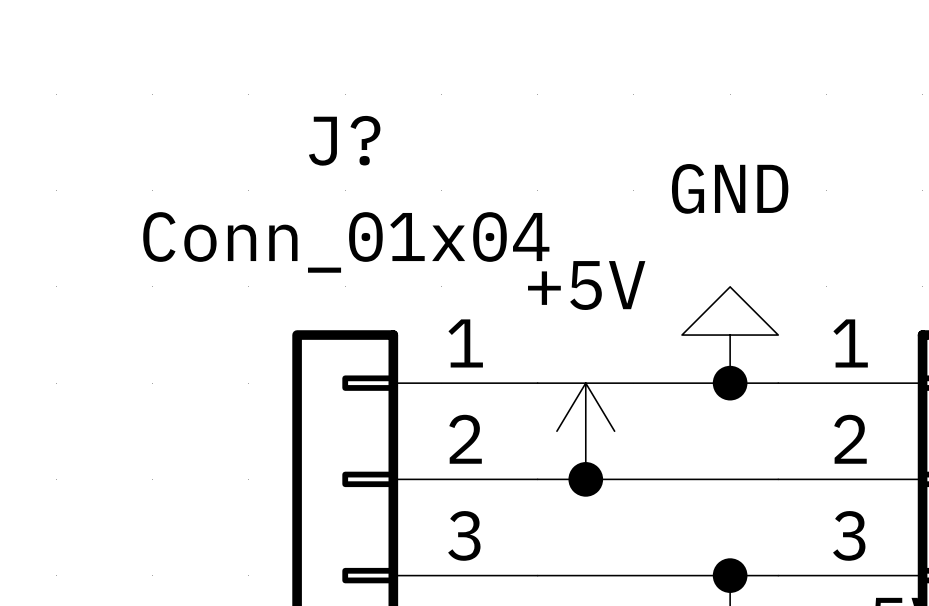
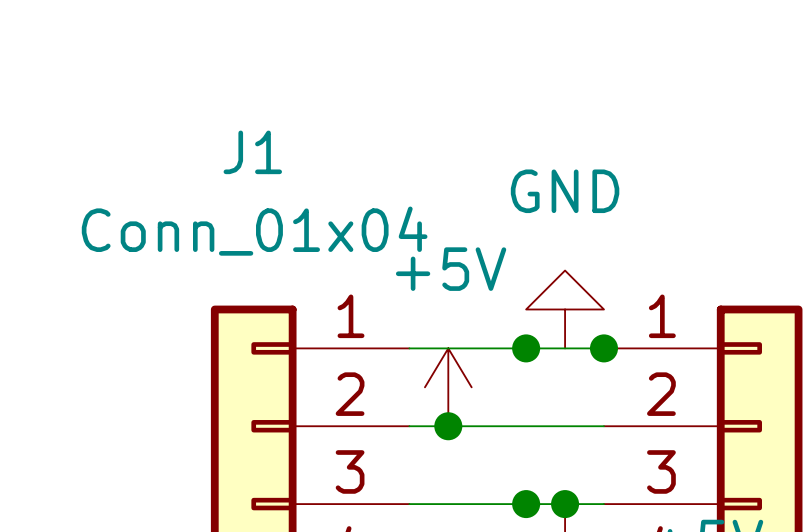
J? name: J? (344, 140) -> J1 (252, 152)
junction: none -> (526, 348)
junction: (730, 383) -> none
junction: none -> (603, 348)
junction: none -> (526, 504)

